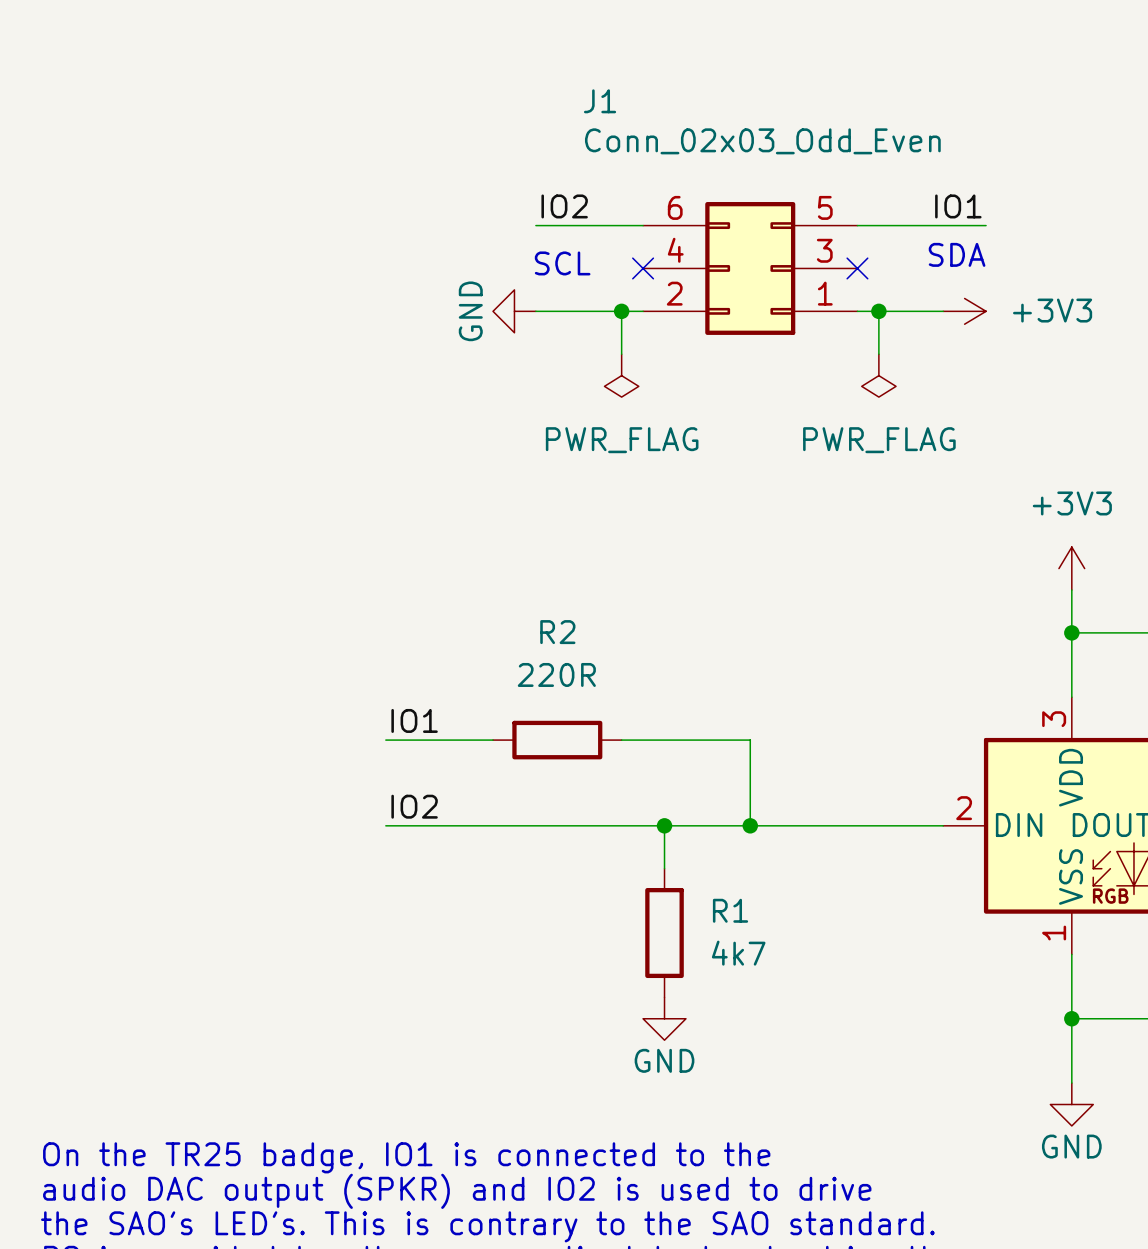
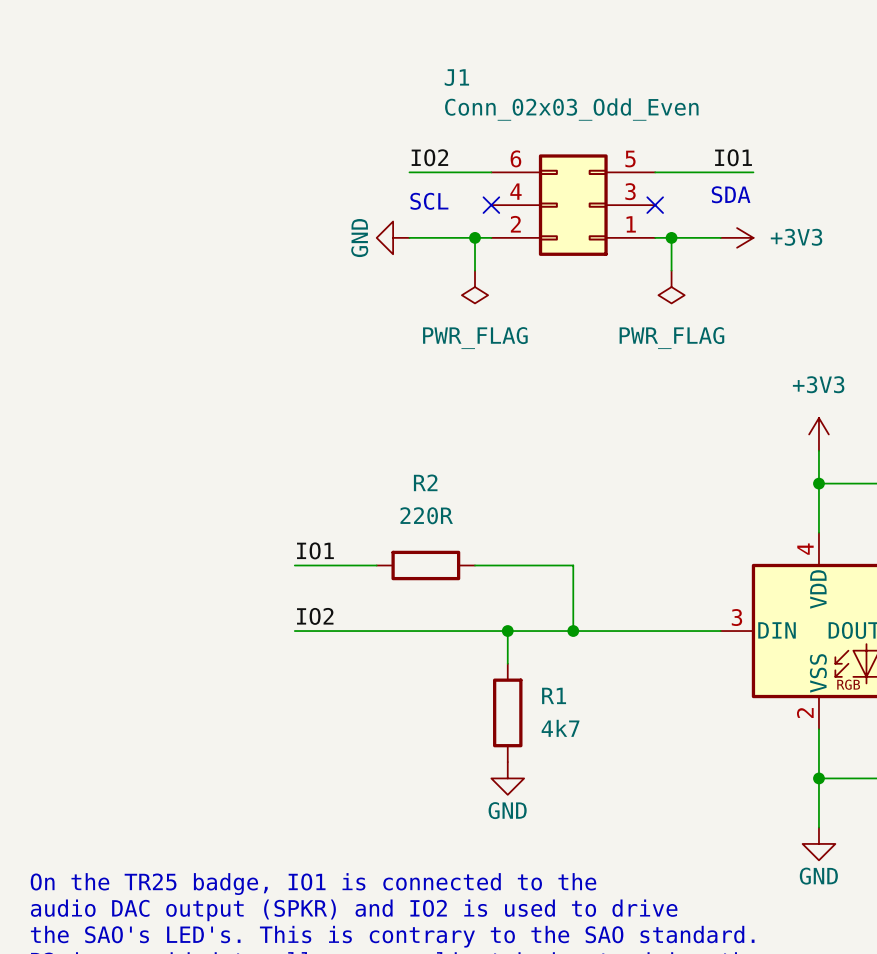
part pin number: 3 (1054, 719) -> 4 (805, 549)
part pin number: 2 (964, 808) -> 3 (736, 617)
part pin number: 1 (1054, 933) -> 2 (805, 713)

